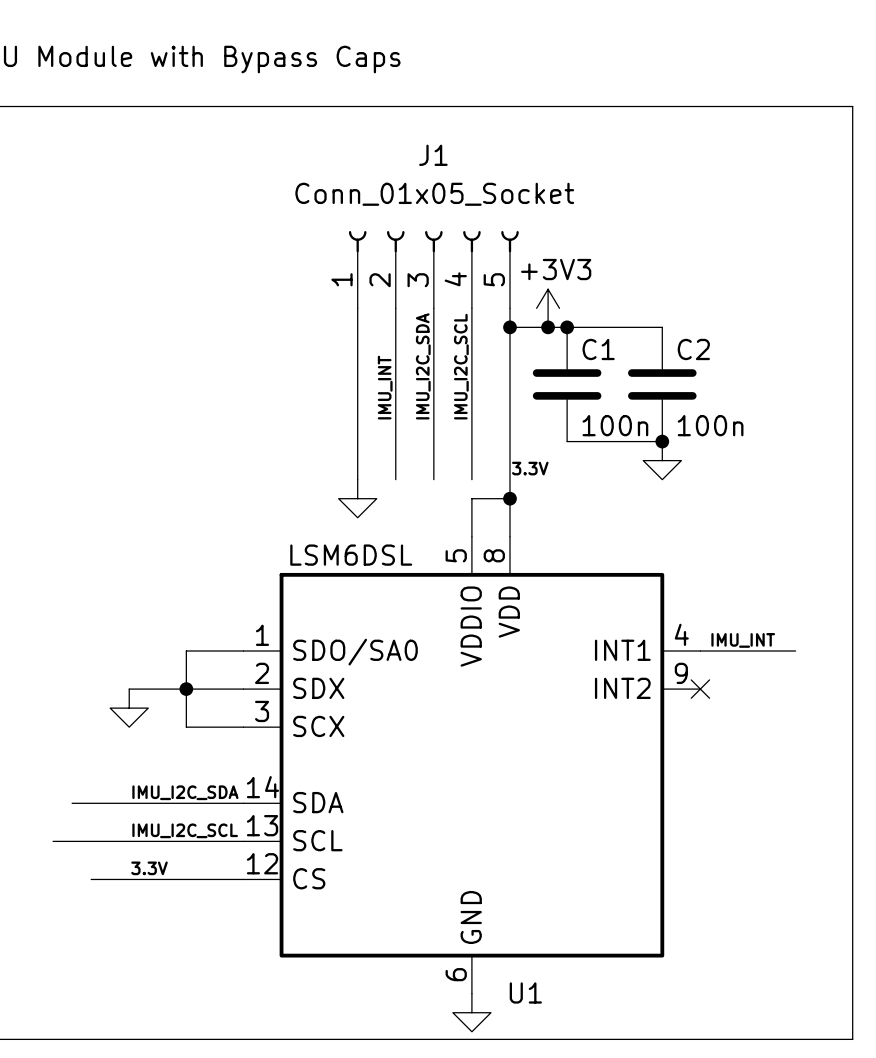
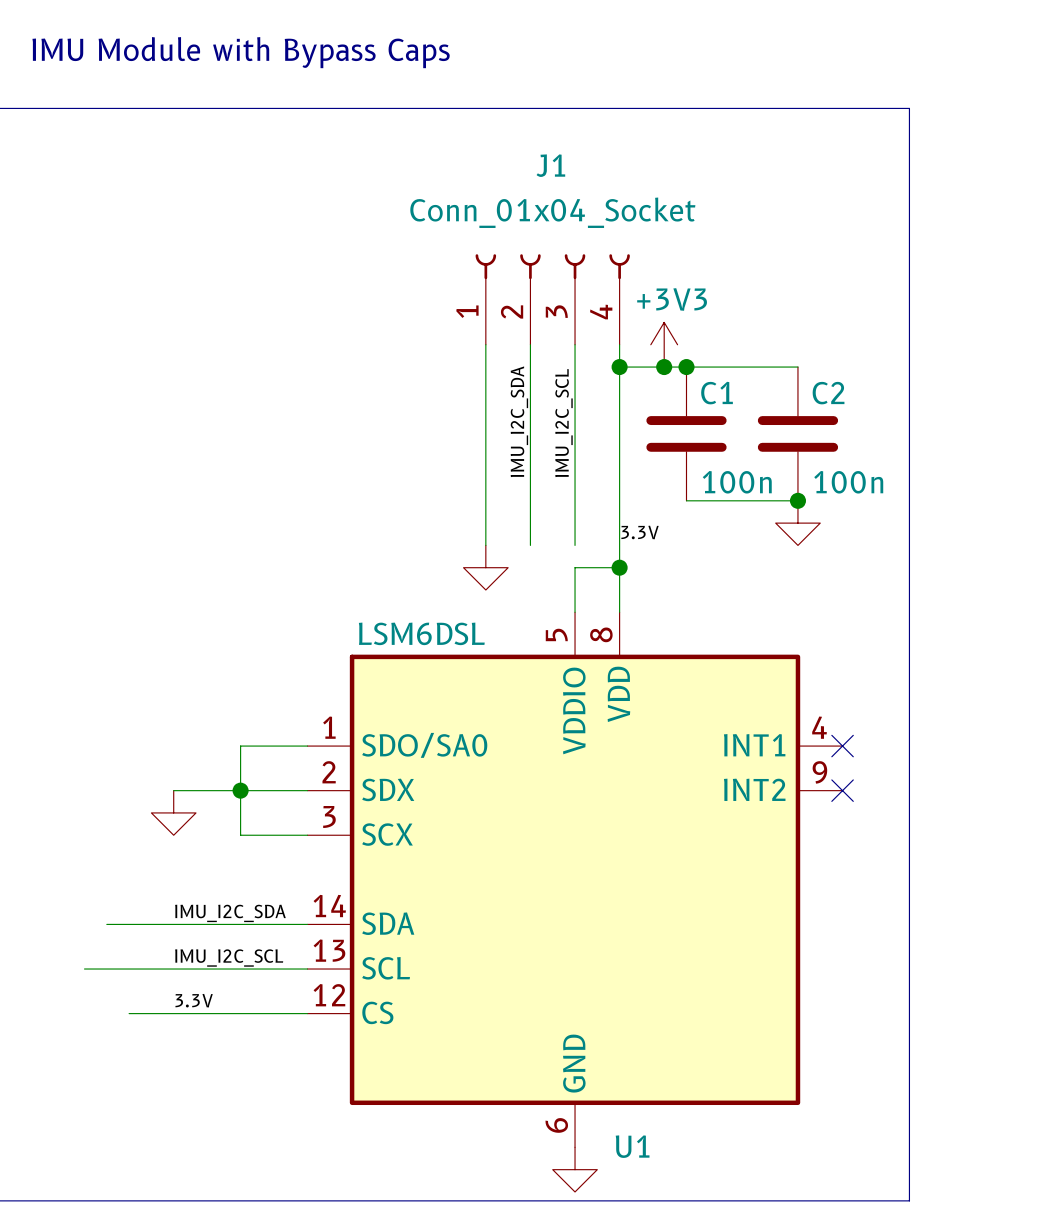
line: (757, 106) (852, 106) (852, 1039) (757, 1039) -> (909, 108) (909, 1200)
J1 value: Conn_01x05_Socket (434, 194) -> Conn_01x04_Socket (552, 212)
J1 symbol: [348, 231, 519, 309] -> [475, 254, 630, 345]
wire: (357, 308) (357, 479) -> none
label: IMU_INT (385, 387) -> none
power symbol position: (357, 498) -> (485, 567)
label: IMU_INT (743, 640) -> none
wire: (700, 651) (795, 651) -> none
no-connect mark: none -> (842, 746)

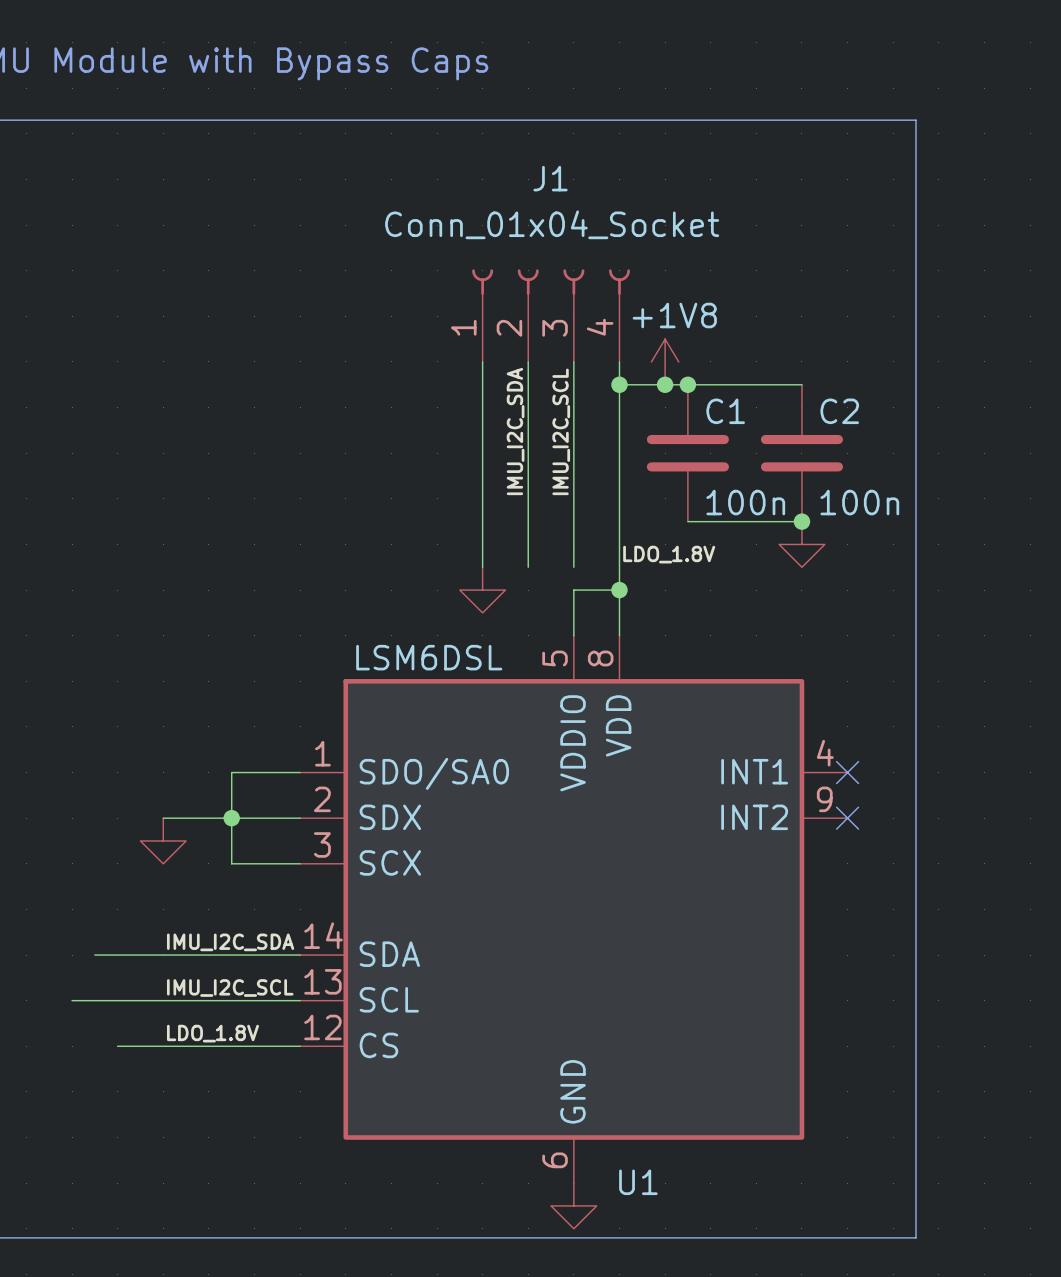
power symbol: +3V3 (664, 344) -> +1V8 (665, 361)
label: 3.3V (640, 532) -> LDO_1.8V (669, 554)
label: 3.3V (194, 1000) -> LDO_1.8V (212, 1033)

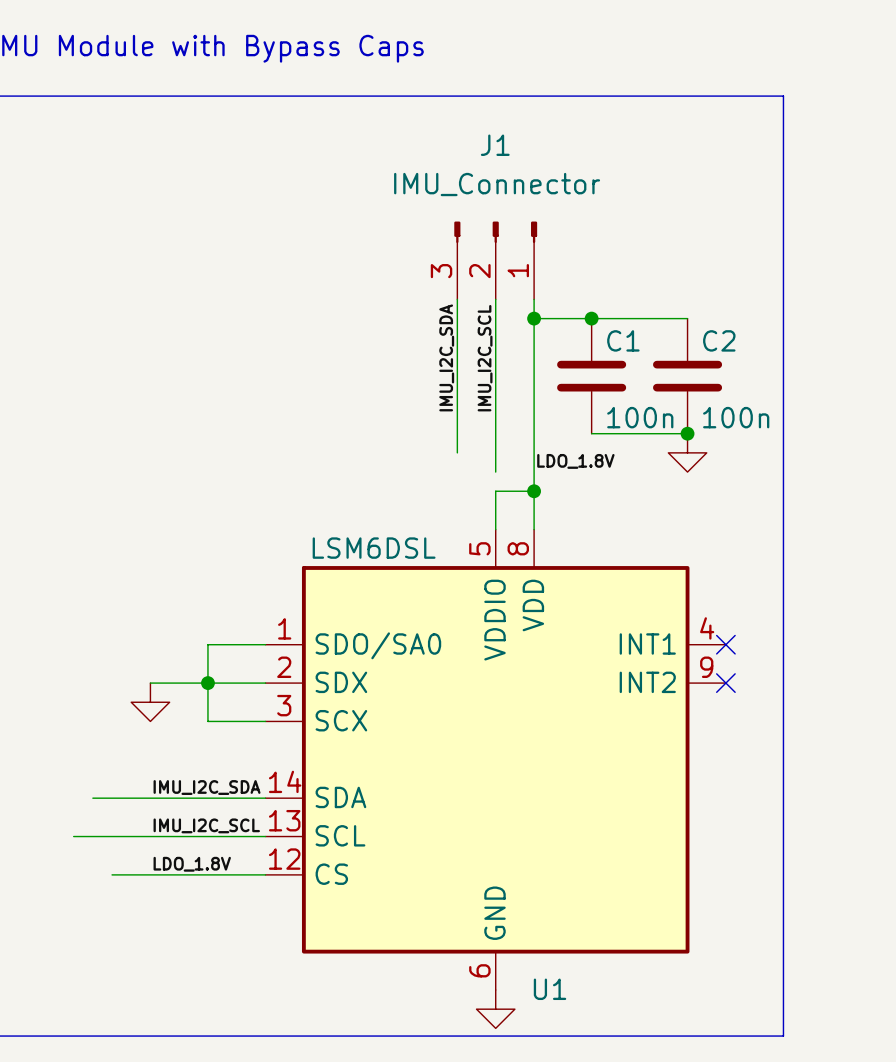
J1 value: Conn_01x04_Socket (552, 224) -> IMU_Connector (497, 184)
J1 symbol: [472, 269, 630, 362] -> [454, 221, 538, 300]
wire: (482, 361) (482, 567) -> none
power symbol: +1V8 (665, 361) -> none
junction: (665, 384) -> none
wire: (528, 544) (528, 567) -> none
power symbol: (482, 590) -> none

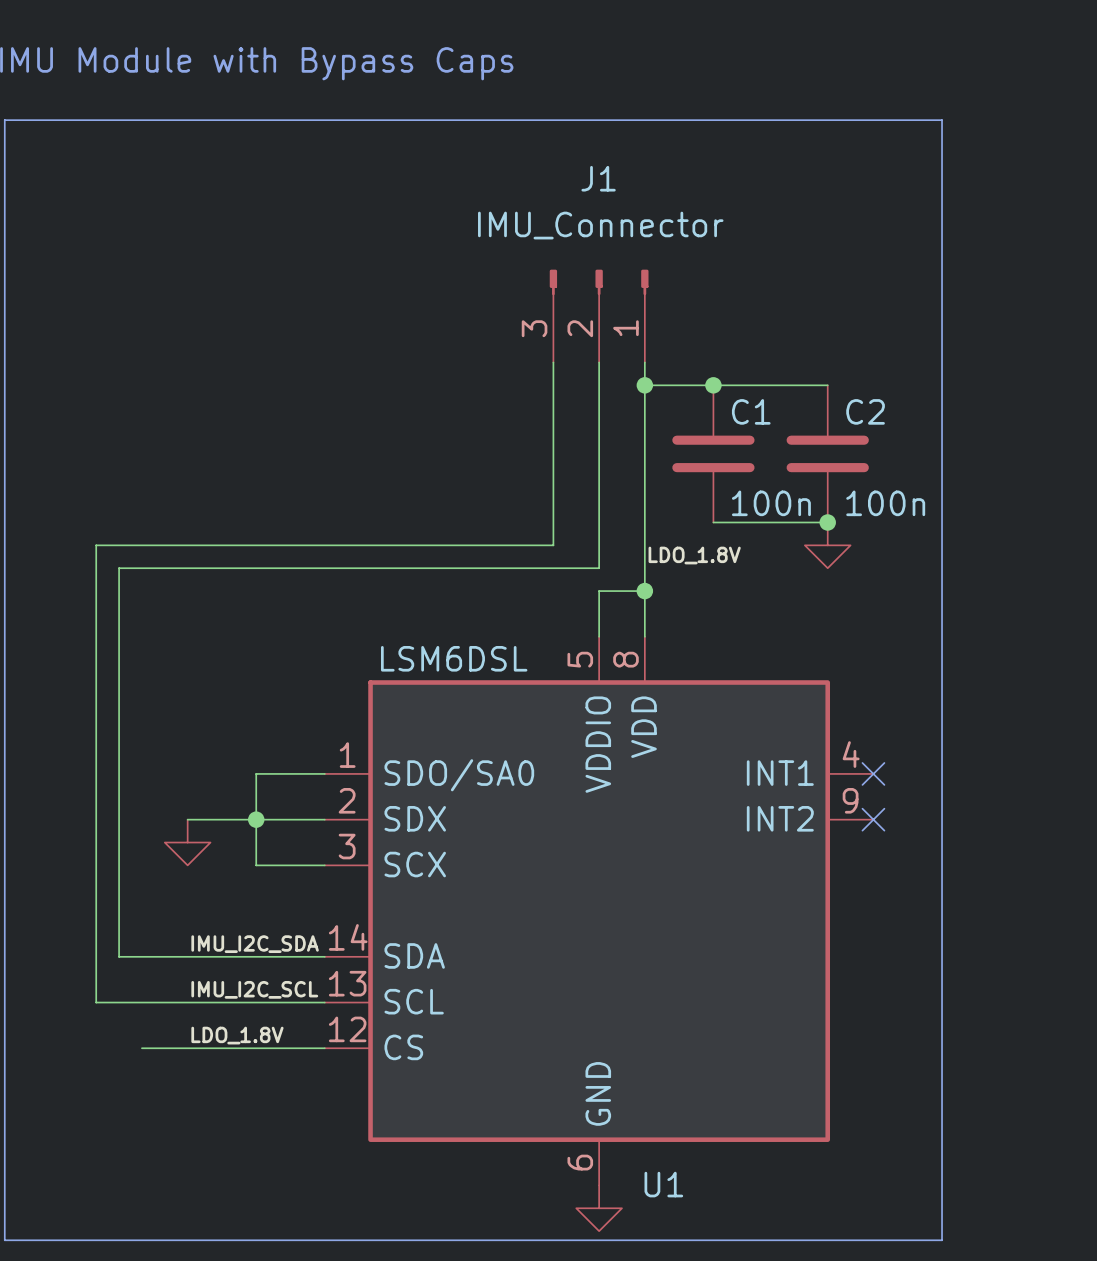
label: IMU_I2C_SDA (446, 357) -> none
label: IMU_I2C_SCL (485, 358) -> none
wire: none -> (553, 545) (96, 545) (96, 1002)
wire: none -> (599, 568) (119, 568) (119, 956)

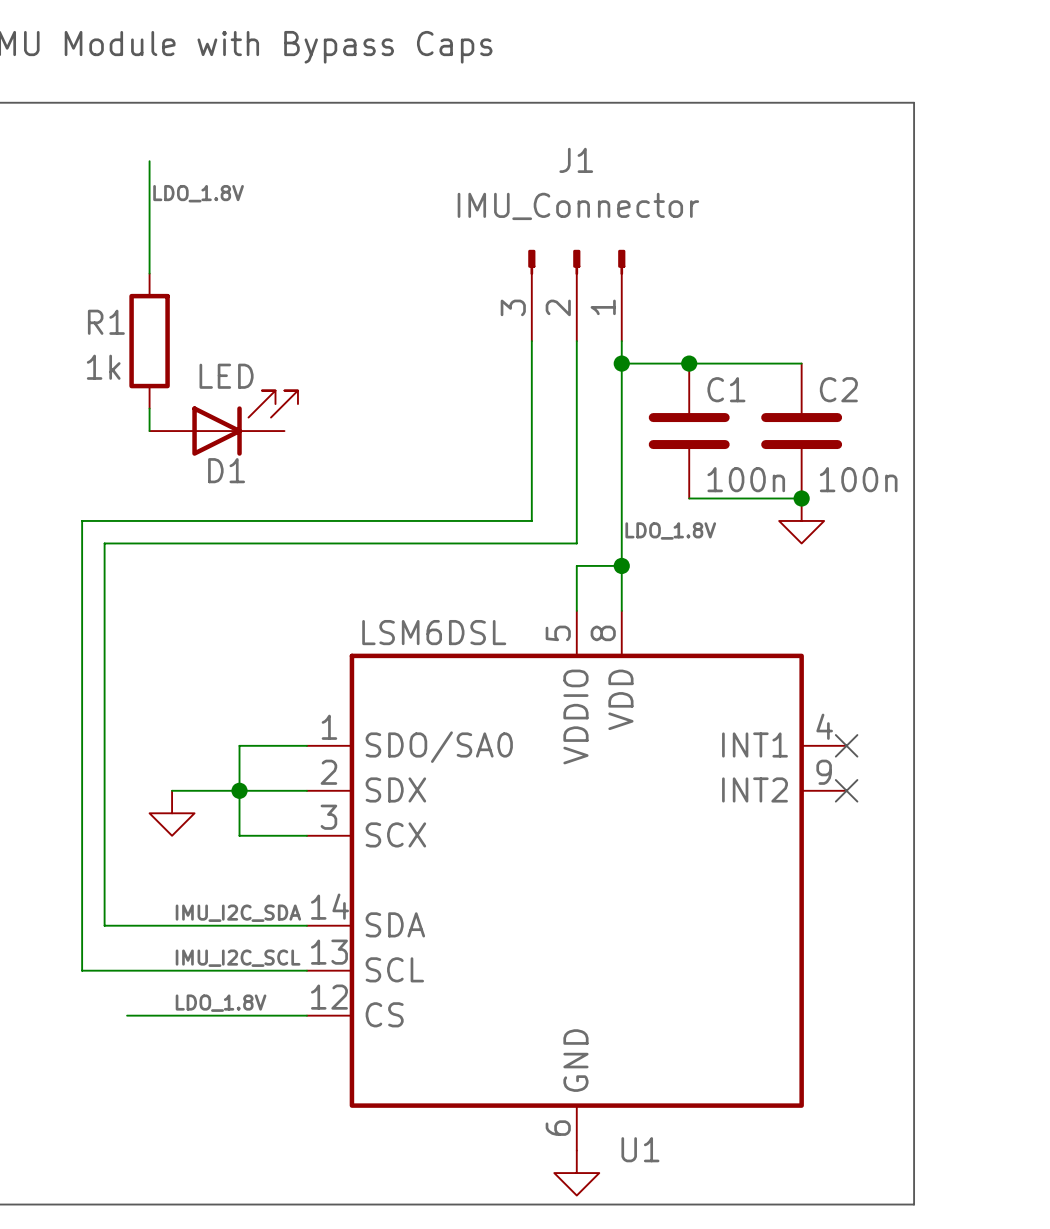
wire: none -> (149, 161) (149, 273)
label: none -> LDO_1.8V (198, 193)
R1: none -> 1k (149, 341)
wire: none -> (149, 408) (149, 431)
D1: none -> LED (223, 423)

